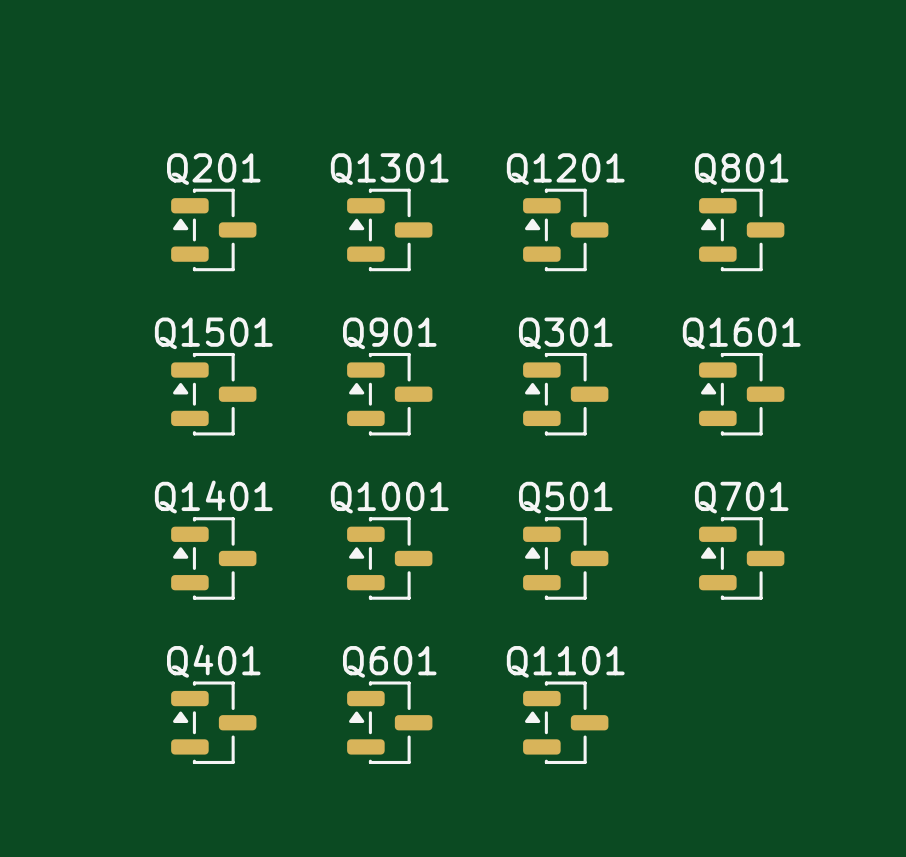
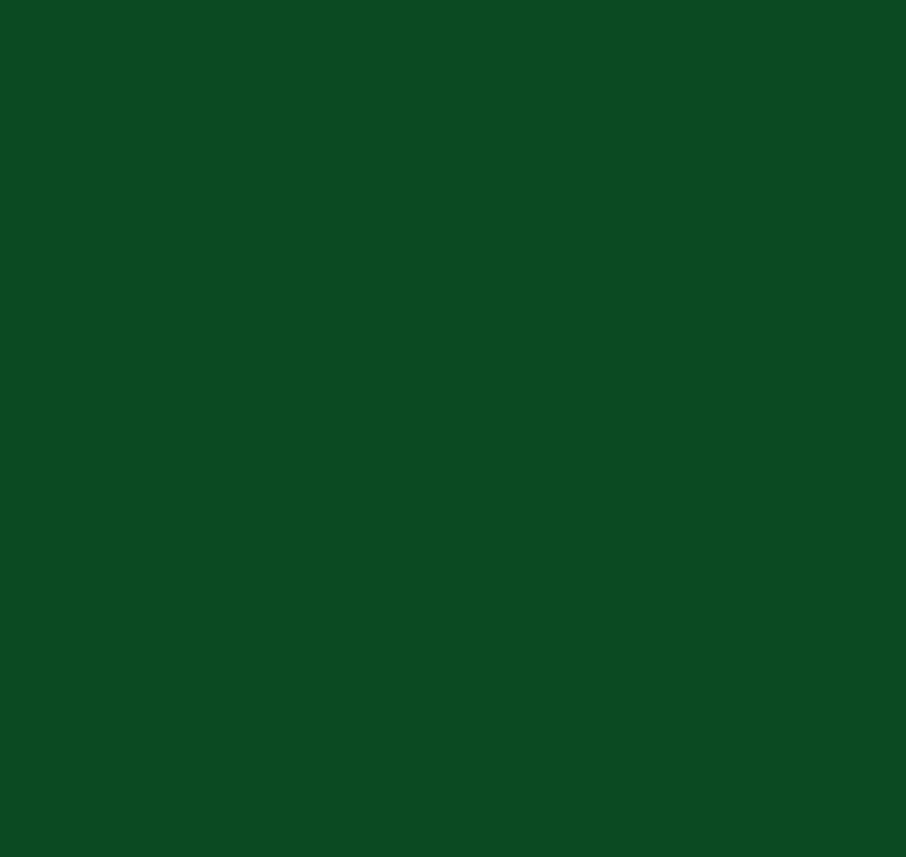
Q201: (213, 229) -> none
Q1301: (389, 229) -> none
Q1201: (565, 229) -> none
Q801: (741, 229) -> none
Q1501: (213, 394) -> none
Q901: (389, 394) -> none
Q301: (565, 394) -> none
Q1601: (741, 394) -> none
Q1401: (213, 558) -> none
Q1001: (389, 558) -> none
Q501: (565, 558) -> none
Q701: (741, 558) -> none
Q401: (213, 722) -> none
Q601: (389, 722) -> none
Q1101: (565, 722) -> none

